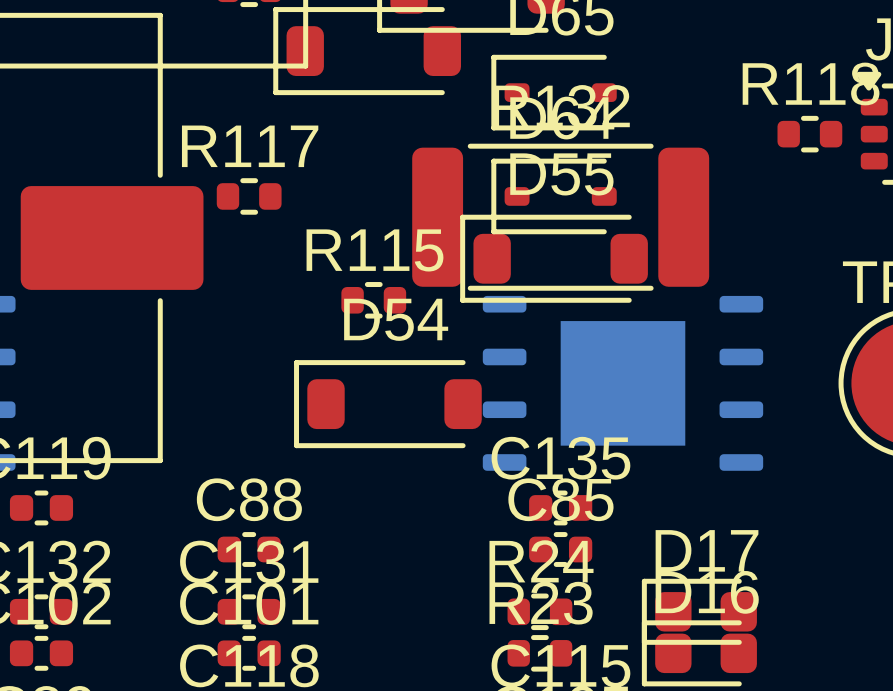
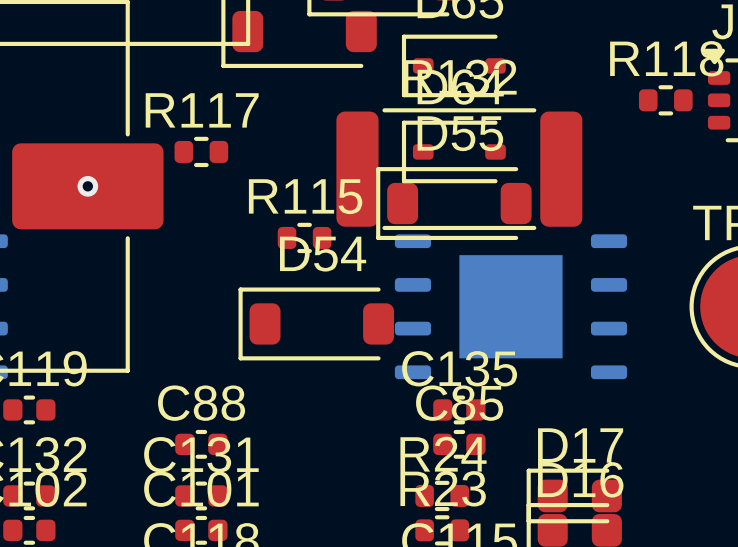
via: none -> (87, 186)

